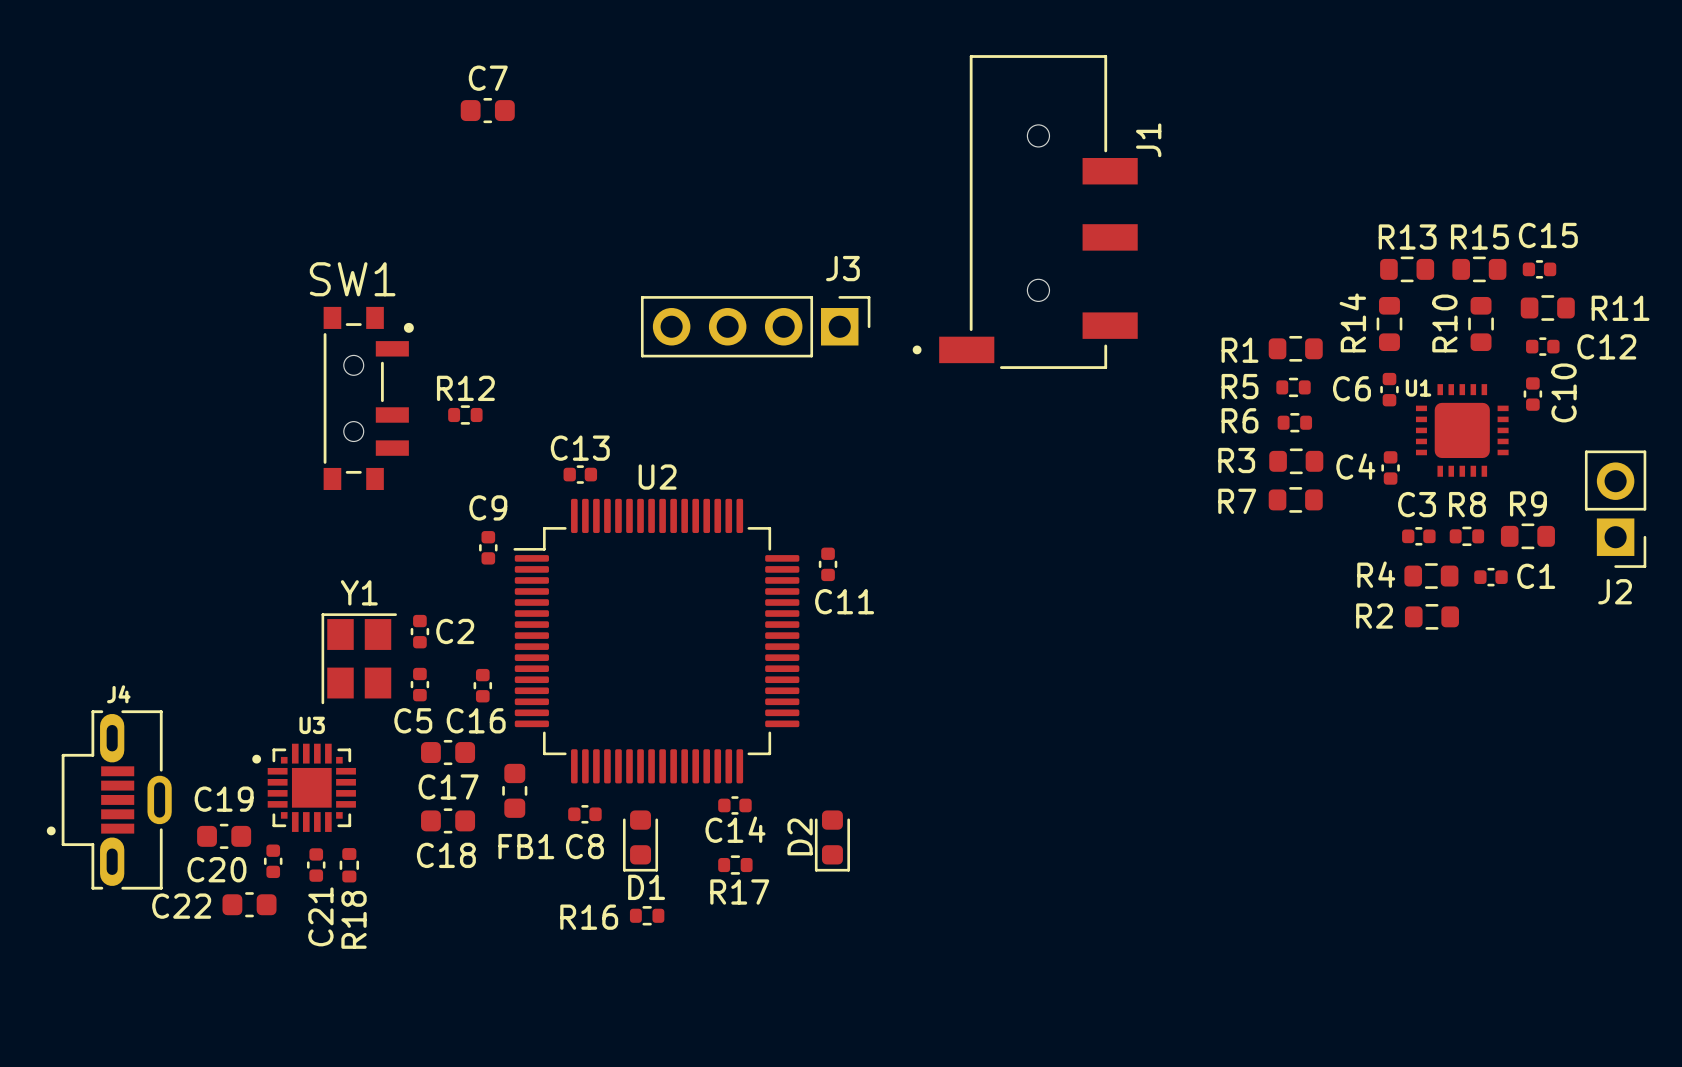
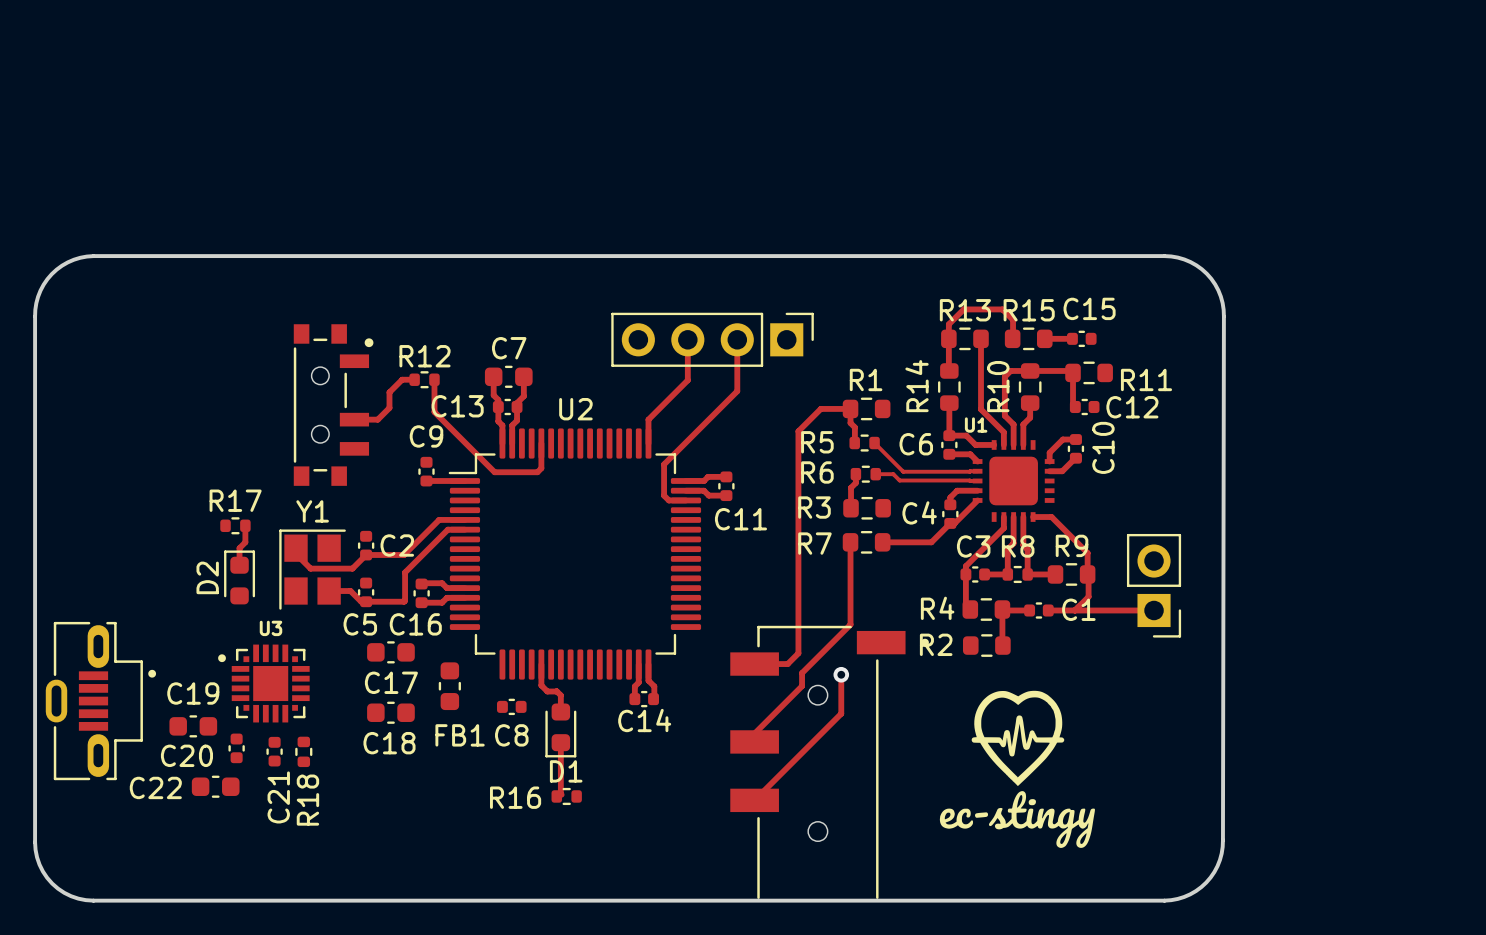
C7 position: (487, 110) -> (508, 376)
J1: (1025, 212) -> none
R13 position: (1407, 269) -> (964, 338)
R15 position: (1479, 269) -> (1028, 338)
C15 position: (1539, 269) -> (1081, 338)
board edge: none -> (93, 256) (1164, 256) (1177, 257) (1190, 262) (1201, 269) (1215, 284) (1222, 303) (1223, 316) (1222, 840) (1219, 859) (1214, 872) (1195, 891) (1184, 897) (1164, 900) (93, 900) (78, 898) (64, 892) (52, 883) (42, 871) (37, 857) (35, 842) (35, 309) (43, 284) (56, 269) (73, 259) (93, 256)
R11 position: (1547, 308) -> (1089, 372)
R11 name position: R11 (1620, 308) -> R11 (1146, 379)
R14 position: (1389, 323) -> (949, 387)
R10 position: (1481, 323) -> (1030, 387)
J3: (755, 326) -> none
C12 position: (1542, 346) -> (1084, 406)
C12 name position: C12 (1606, 346) -> C12 (1132, 407)
R1 position: (1295, 348) -> (866, 408)
R1 name position: R1 (1240, 350) -> R1 (866, 379)
R5 position: (1293, 387) -> (864, 443)
U1 name position: U1 (1418, 387) -> U1 (976, 425)
C6 position: (1389, 389) -> (949, 444)
C10 position: (1532, 394) -> (1075, 448)
track: none -> (981, 338) (981, 409) (1003, 432) (1003, 444)
track: none -> (1012, 338) (1013, 319) (1002, 309) (963, 309) (948, 324) (949, 370)
track: none -> (1044, 338) (1072, 338)
SW1: (368, 398) -> none
track: none -> (687, 339) (687, 380) (648, 419) (648, 443)
part: none -> (712, 339)
track: none -> (737, 339) (737, 391) (664, 464) (664, 495) (668, 500) (685, 500)
R12 position: (465, 414) -> (424, 379)
R6 position: (1294, 422) -> (865, 474)
U1 position: (1462, 430) -> (1013, 480)
track: none -> (493, 376) (493, 395) (498, 399) (498, 421) (502, 425) (502, 443)
track: none -> (523, 376) (523, 396) (517, 403) (517, 420) (512, 425) (512, 443)
track: none -> (414, 379) (402, 379) (389, 392) (389, 407) (377, 419) (354, 419)
track: none -> (434, 379) (434, 412) (494, 472) (537, 472) (541, 468) (541, 443)
C13 name position: C13 (580, 448) -> C13 (457, 406)
R3 position: (1296, 461) -> (867, 508)
C4 position: (1390, 467) -> (950, 514)
track: none -> (949, 403) (949, 435) (966, 435) (975, 444) (994, 444)
track: none -> (1030, 403) (1030, 417) (1023, 424) (1023, 444)
part: none -> (333, 405)
track: none -> (1075, 406) (1073, 404) (1073, 372) (1071, 370) (1010, 370) (1004, 376) (1004, 415) (1013, 424) (1013, 444)
R7 position: (1295, 499) -> (866, 542)
J2: (1615, 509) -> none
track: none -> (1075, 439) (1062, 439) (1049, 452) (1049, 461)
track: none -> (854, 442) (854, 427) (850, 423) (850, 408) (820, 408) (798, 431) (798, 653) (787, 664) (754, 664)
track: none -> (874, 443) (903, 471) (977, 471)
track: none -> (949, 454) (970, 454) (977, 461)
track: none -> (1075, 458) (1062, 471) (1049, 471)
C3 position: (1418, 536) -> (975, 574)
R8 position: (1466, 536) -> (1017, 574)
R9 position: (1527, 536) -> (1071, 574)
track: none -> (855, 474) (855, 482) (851, 487) (851, 508)
track: none -> (875, 474) (893, 474) (899, 480) (977, 480)
track: none -> (726, 476) (708, 476) (703, 480) (685, 480)
track: none -> (426, 480) (464, 480)
track: none -> (685, 490) (703, 490) (708, 495) (726, 495)
track: none -> (977, 490) (957, 490) (950, 497) (950, 504)
R4 position: (1431, 576) -> (986, 609)
C1 position: (1490, 577) -> (1038, 610)
track: none -> (977, 500) (954, 523) (950, 523) (931, 542) (882, 542)
track: none -> (1003, 517) (1003, 528) (965, 566) (965, 605) (970, 609)
track: none -> (1013, 517) (1013, 543) (1007, 549) (1007, 574) (984, 574)
track: none -> (1023, 517) (1023, 545) (1027, 549) (1027, 574) (1055, 574)
track: none -> (1033, 517) (1051, 517) (1087, 553) (1088, 596) (1074, 610)
track: none -> (464, 519) (439, 519) (404, 554) (366, 554) (352, 568) (310, 568) (296, 554) (296, 548)
track: none -> (245, 525) (245, 542) (239, 548) (239, 565)
track: none -> (464, 529) (447, 529) (405, 572) (404, 601) (361, 601) (350, 591) (329, 591)
R2 position: (1431, 616) -> (986, 645)
track: none -> (850, 542) (850, 624) (802, 673) (802, 686) (754, 733) (754, 741)
track: none -> (421, 584) (442, 583) (446, 588) (464, 588)
part: none -> (1154, 585)
track: none -> (464, 597) (446, 597) (442, 602) (421, 602)
track: none -> (1029, 610) (1002, 609) (1002, 645)
track: none -> (1048, 610) (1154, 610)
track: none -> (541, 664) (541, 685) (547, 691) (556, 691)
track: none -> (638, 664) (638, 682) (634, 686) (634, 699)
track: none -> (648, 664) (648, 680) (654, 686) (653, 699)
track: none -> (841, 674) (841, 713) (754, 800)
via: none -> (841, 674)
track: none -> (556, 691) (560, 695) (560, 712)
drawing: none -> [939, 690, 1095, 848]
J4: (109, 799) -> none
part: none -> (100, 701)
D2 rotation: 0° (832, 840) -> 180° (239, 577)
D2 position: (832, 840) -> (239, 577)
track: none -> (560, 742) (561, 794)
R17 position: (735, 865) -> (235, 525)
part: none -> (829, 762)
R17 name position: R17 (739, 892) -> R17 (235, 500)

